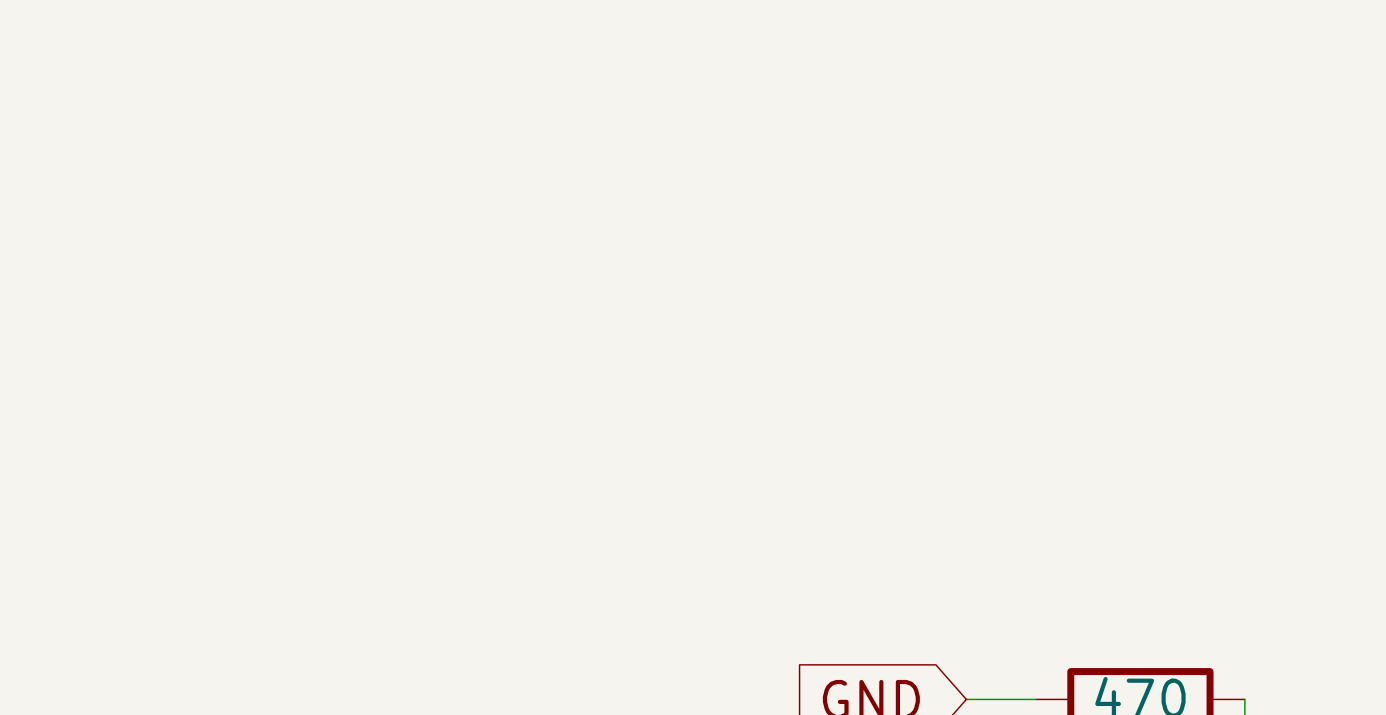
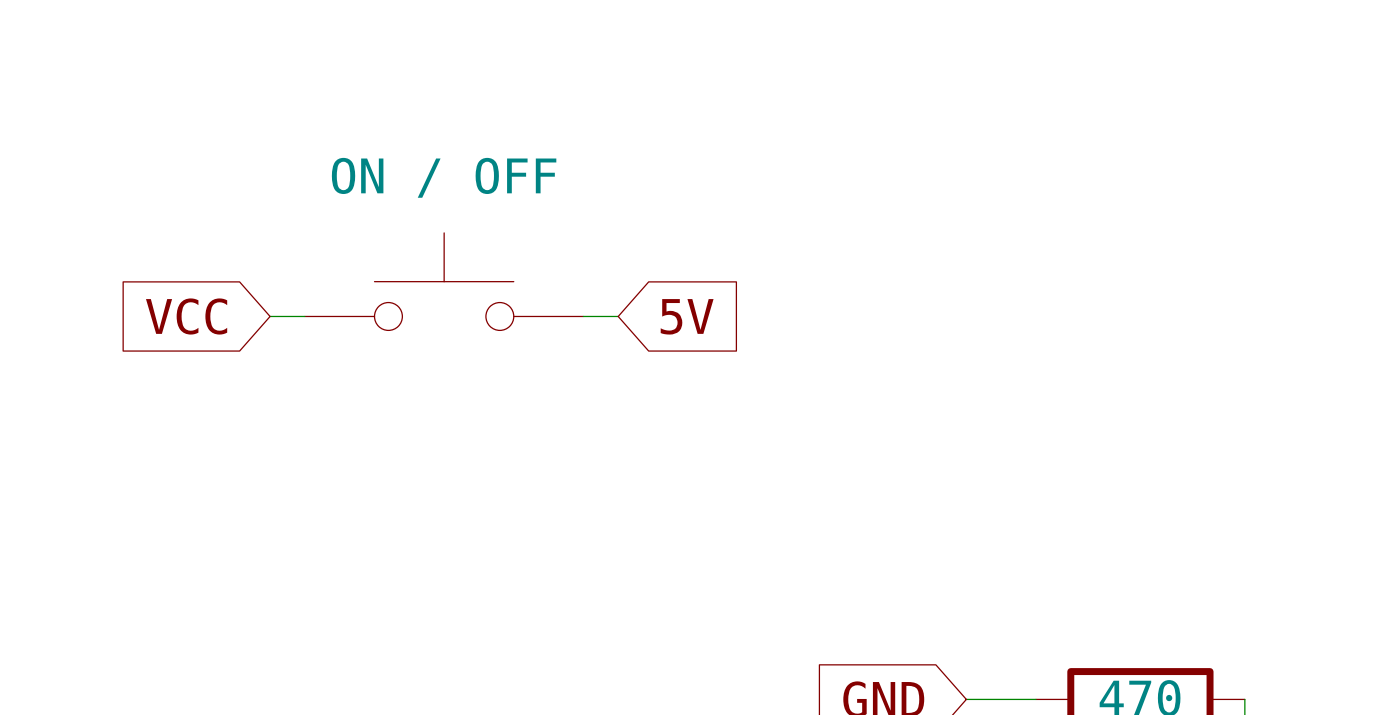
part: none -> ON / OFF (444, 281)
global label: none -> VCC (186, 316)
wire: none -> (270, 316) (304, 316)
wire: none -> (583, 316) (618, 316)
global label: none -> 5V (687, 316)

